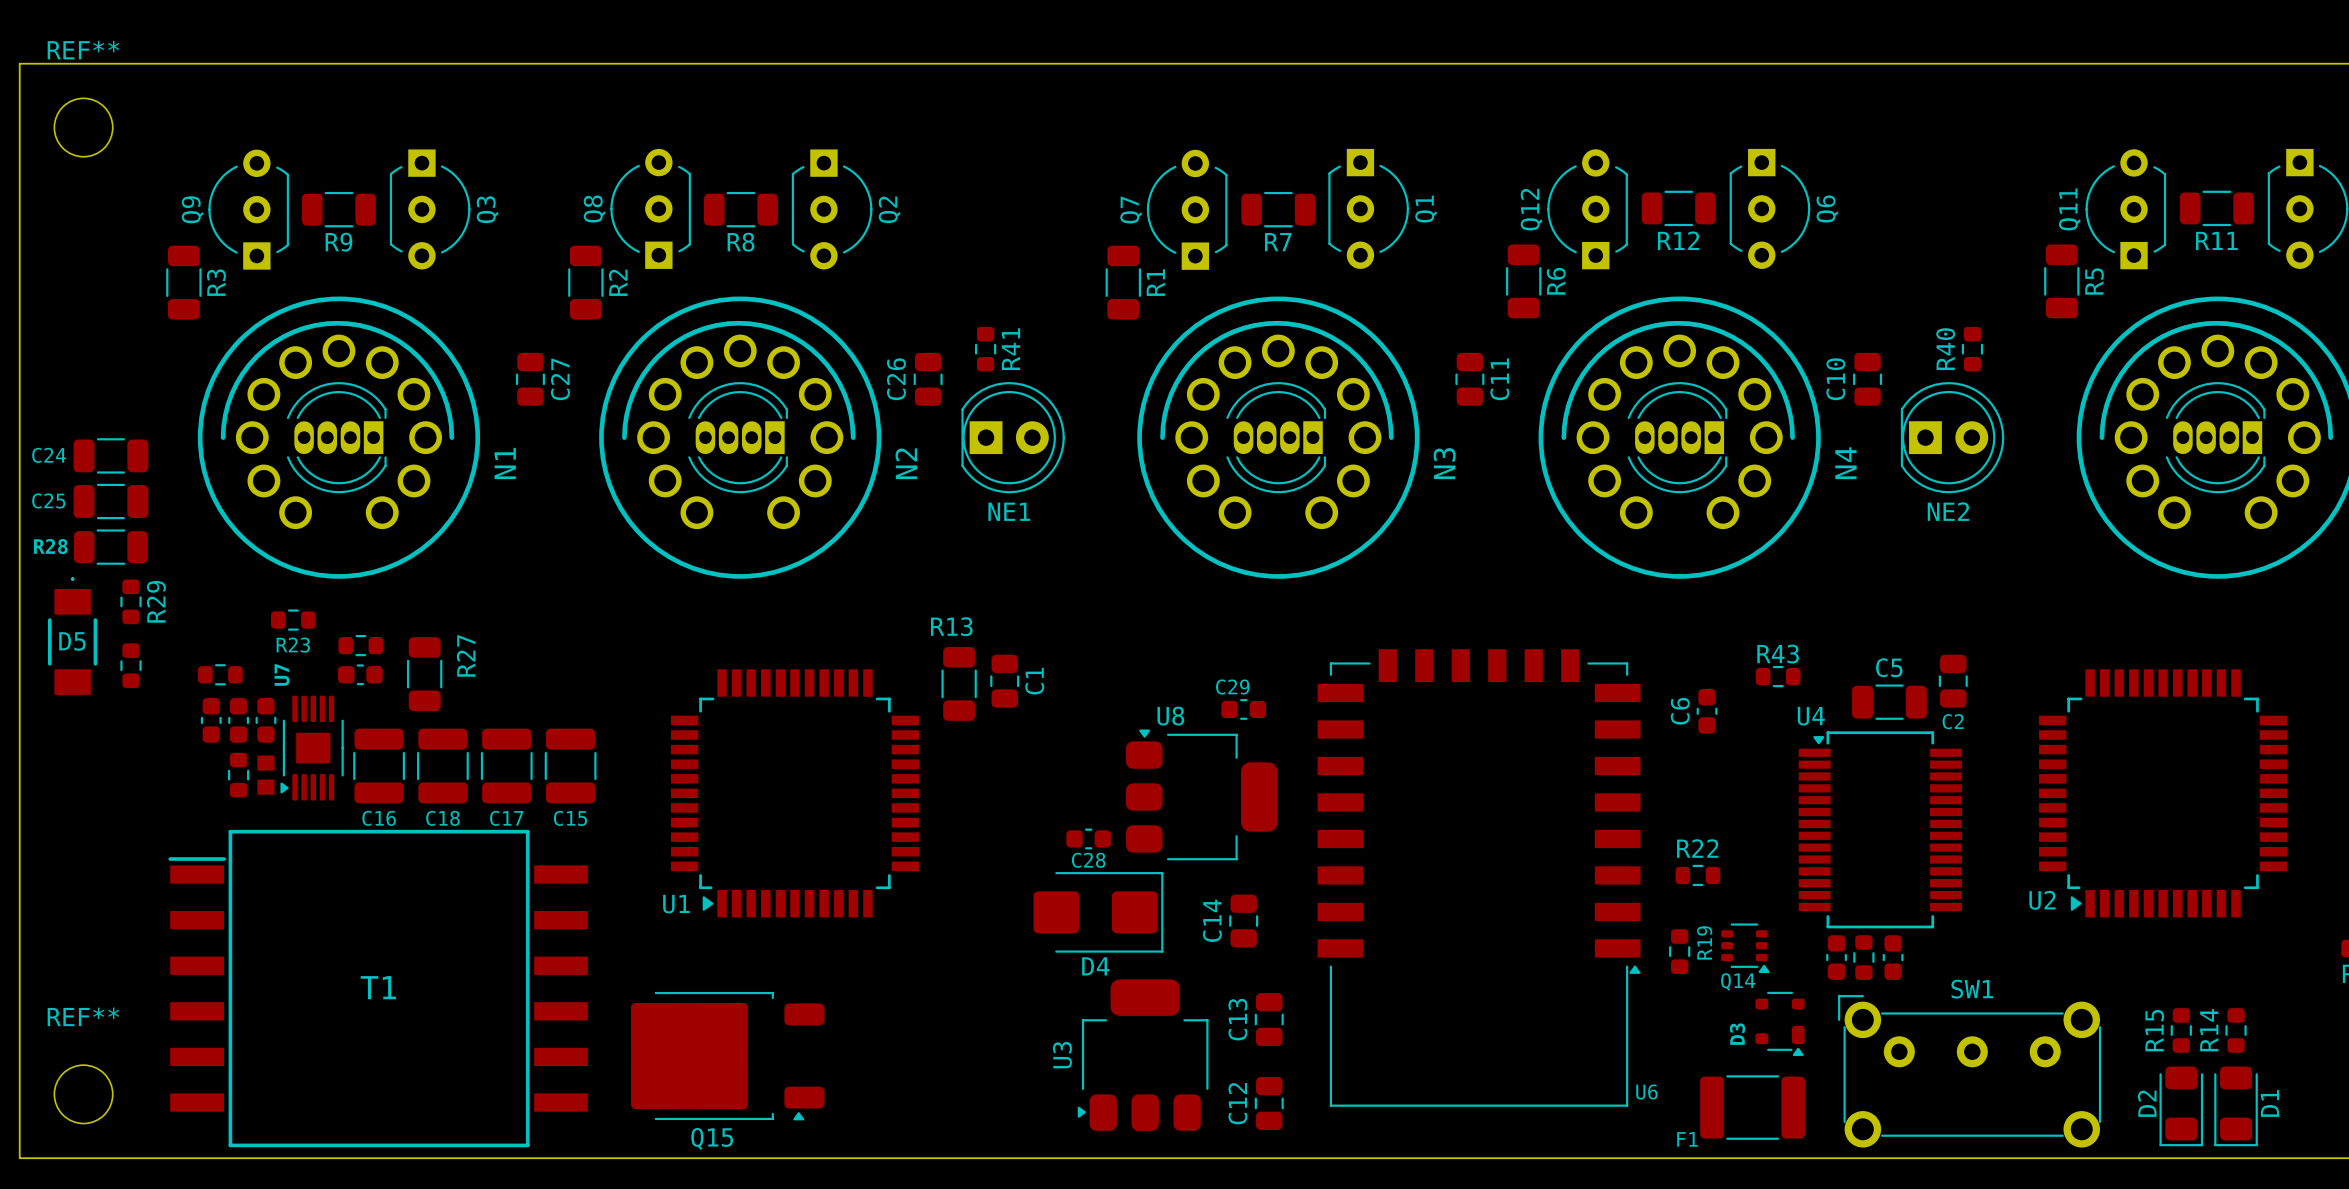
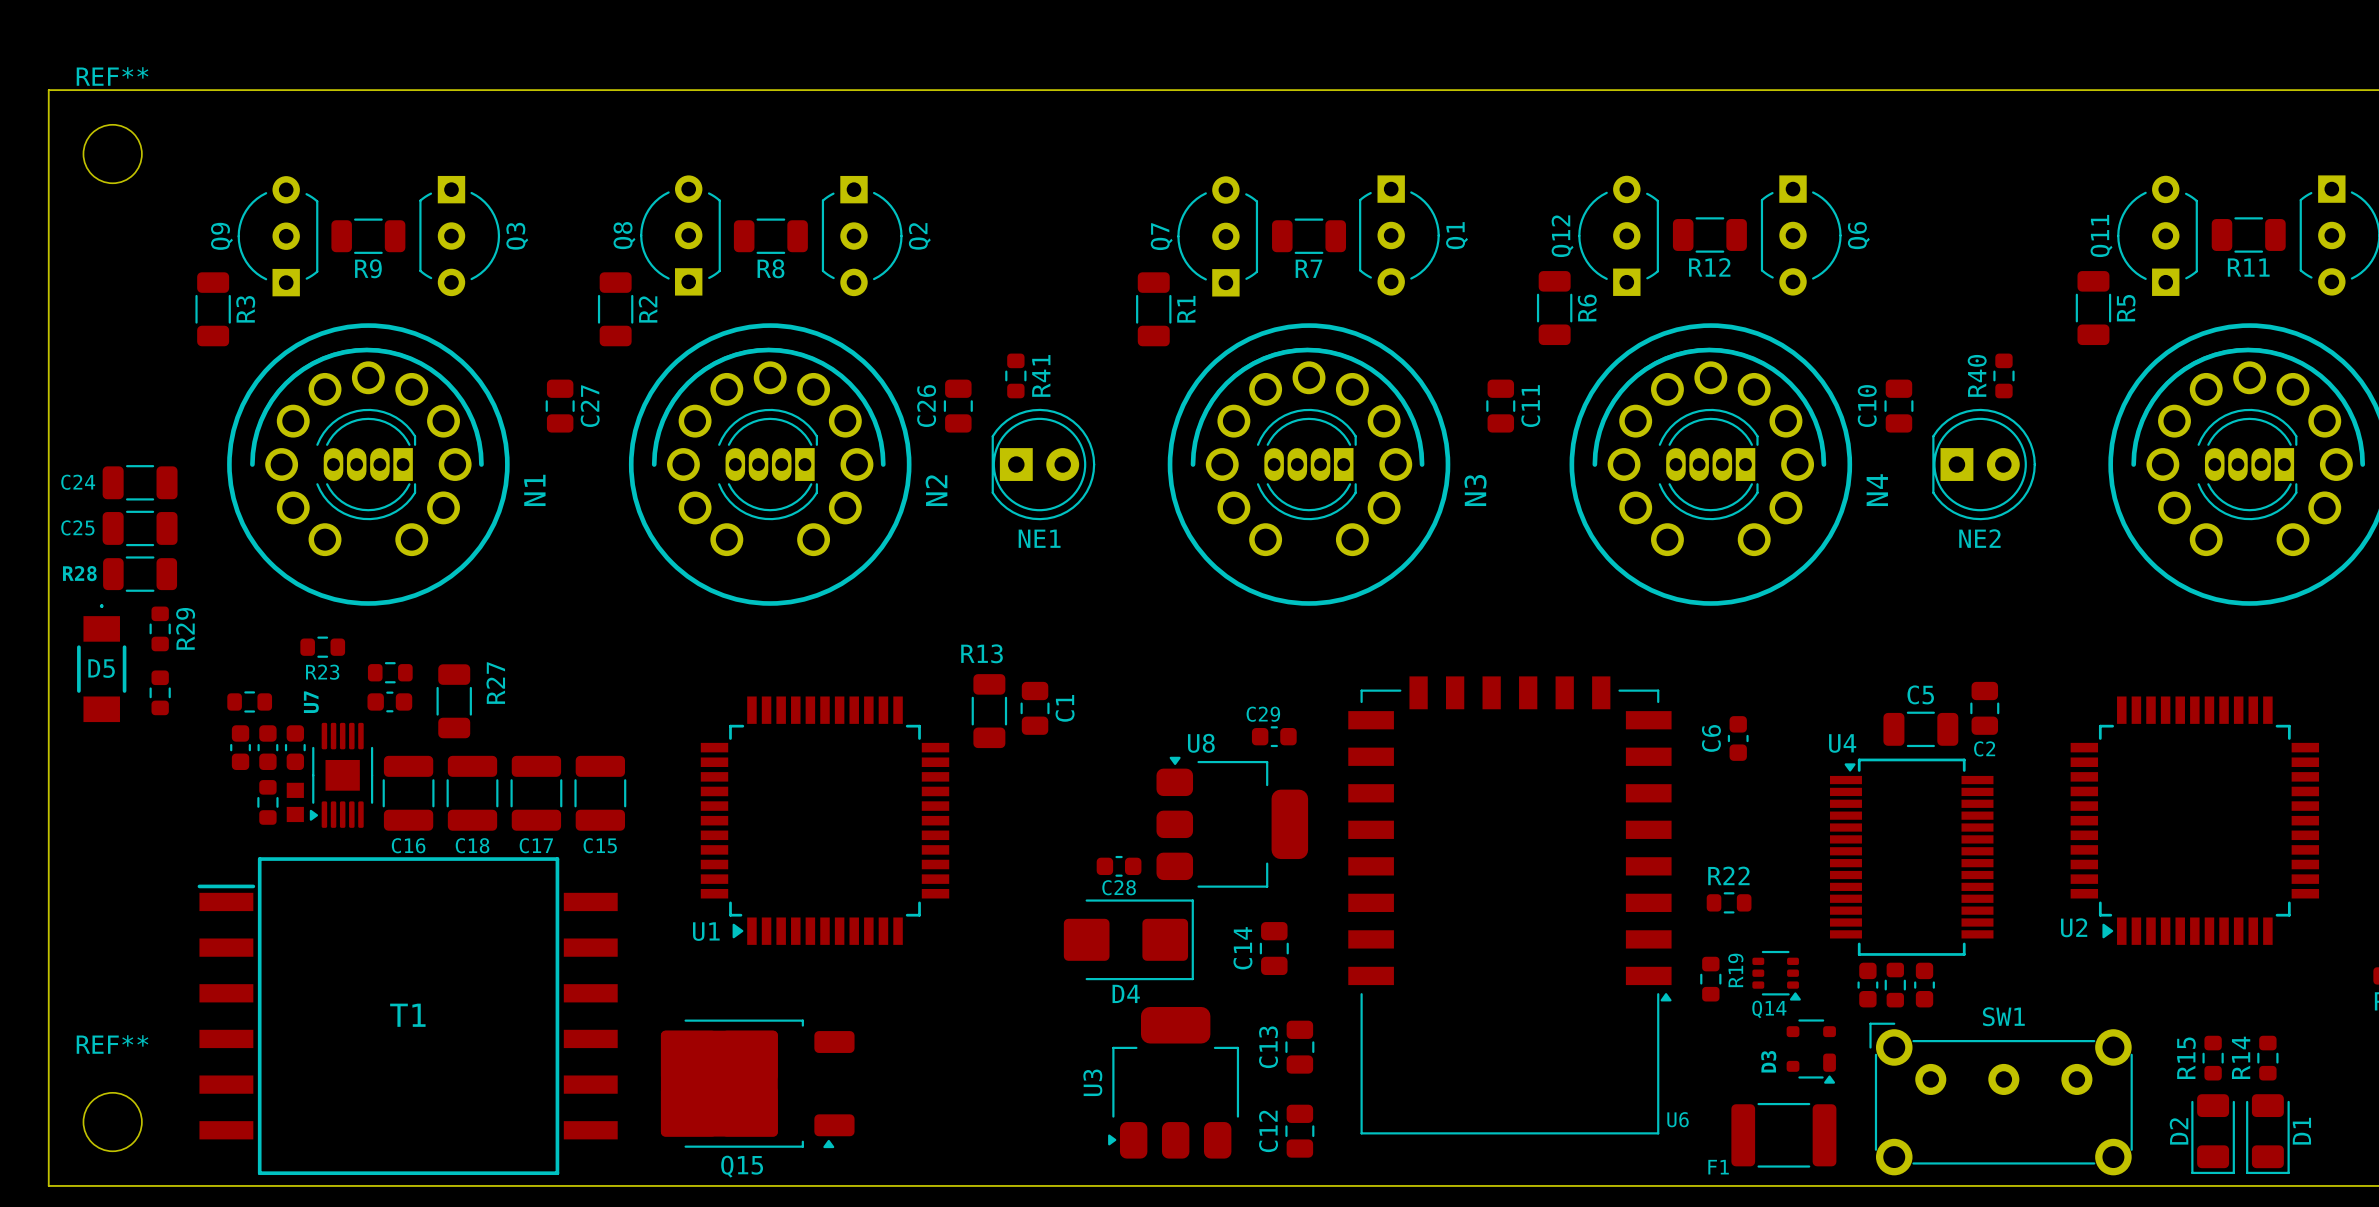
R43: (1778, 676) -> none

